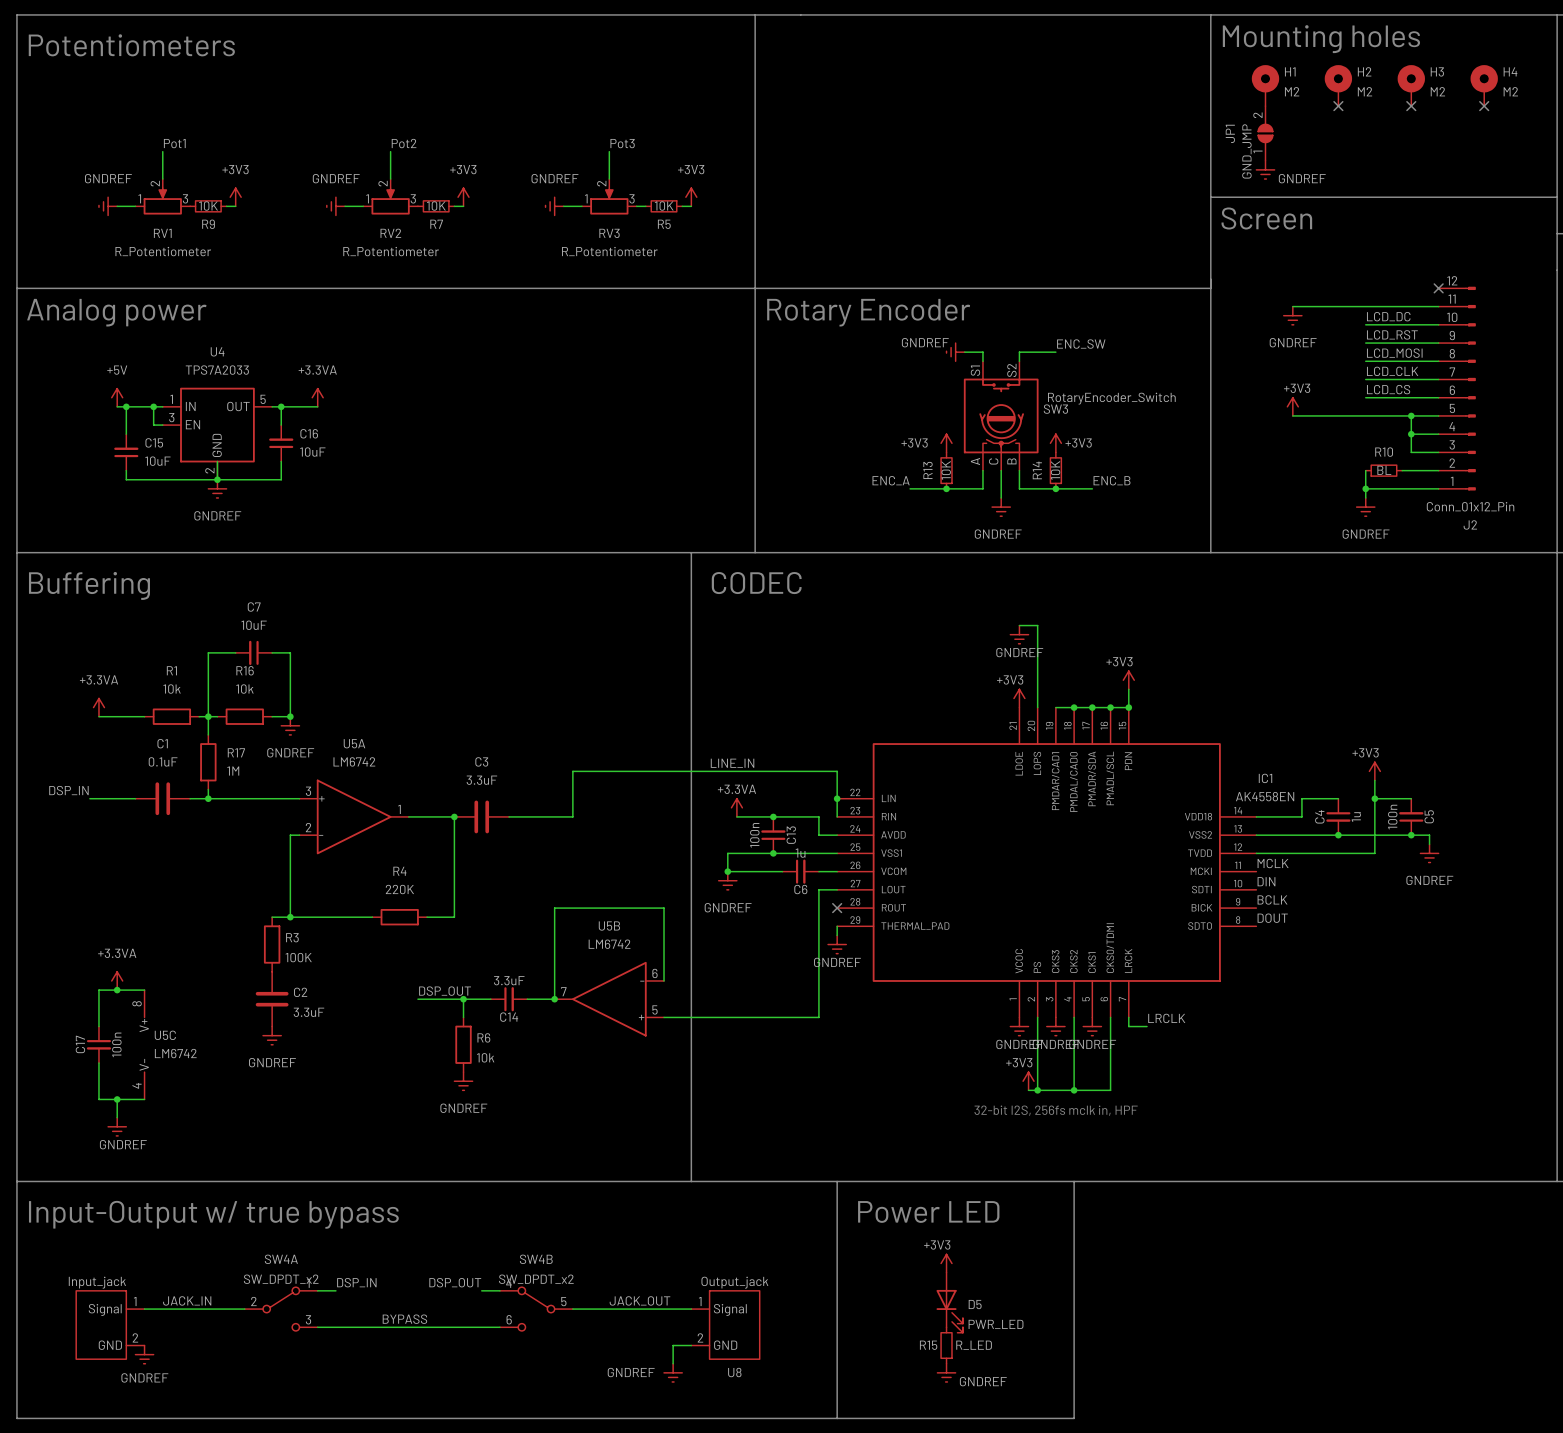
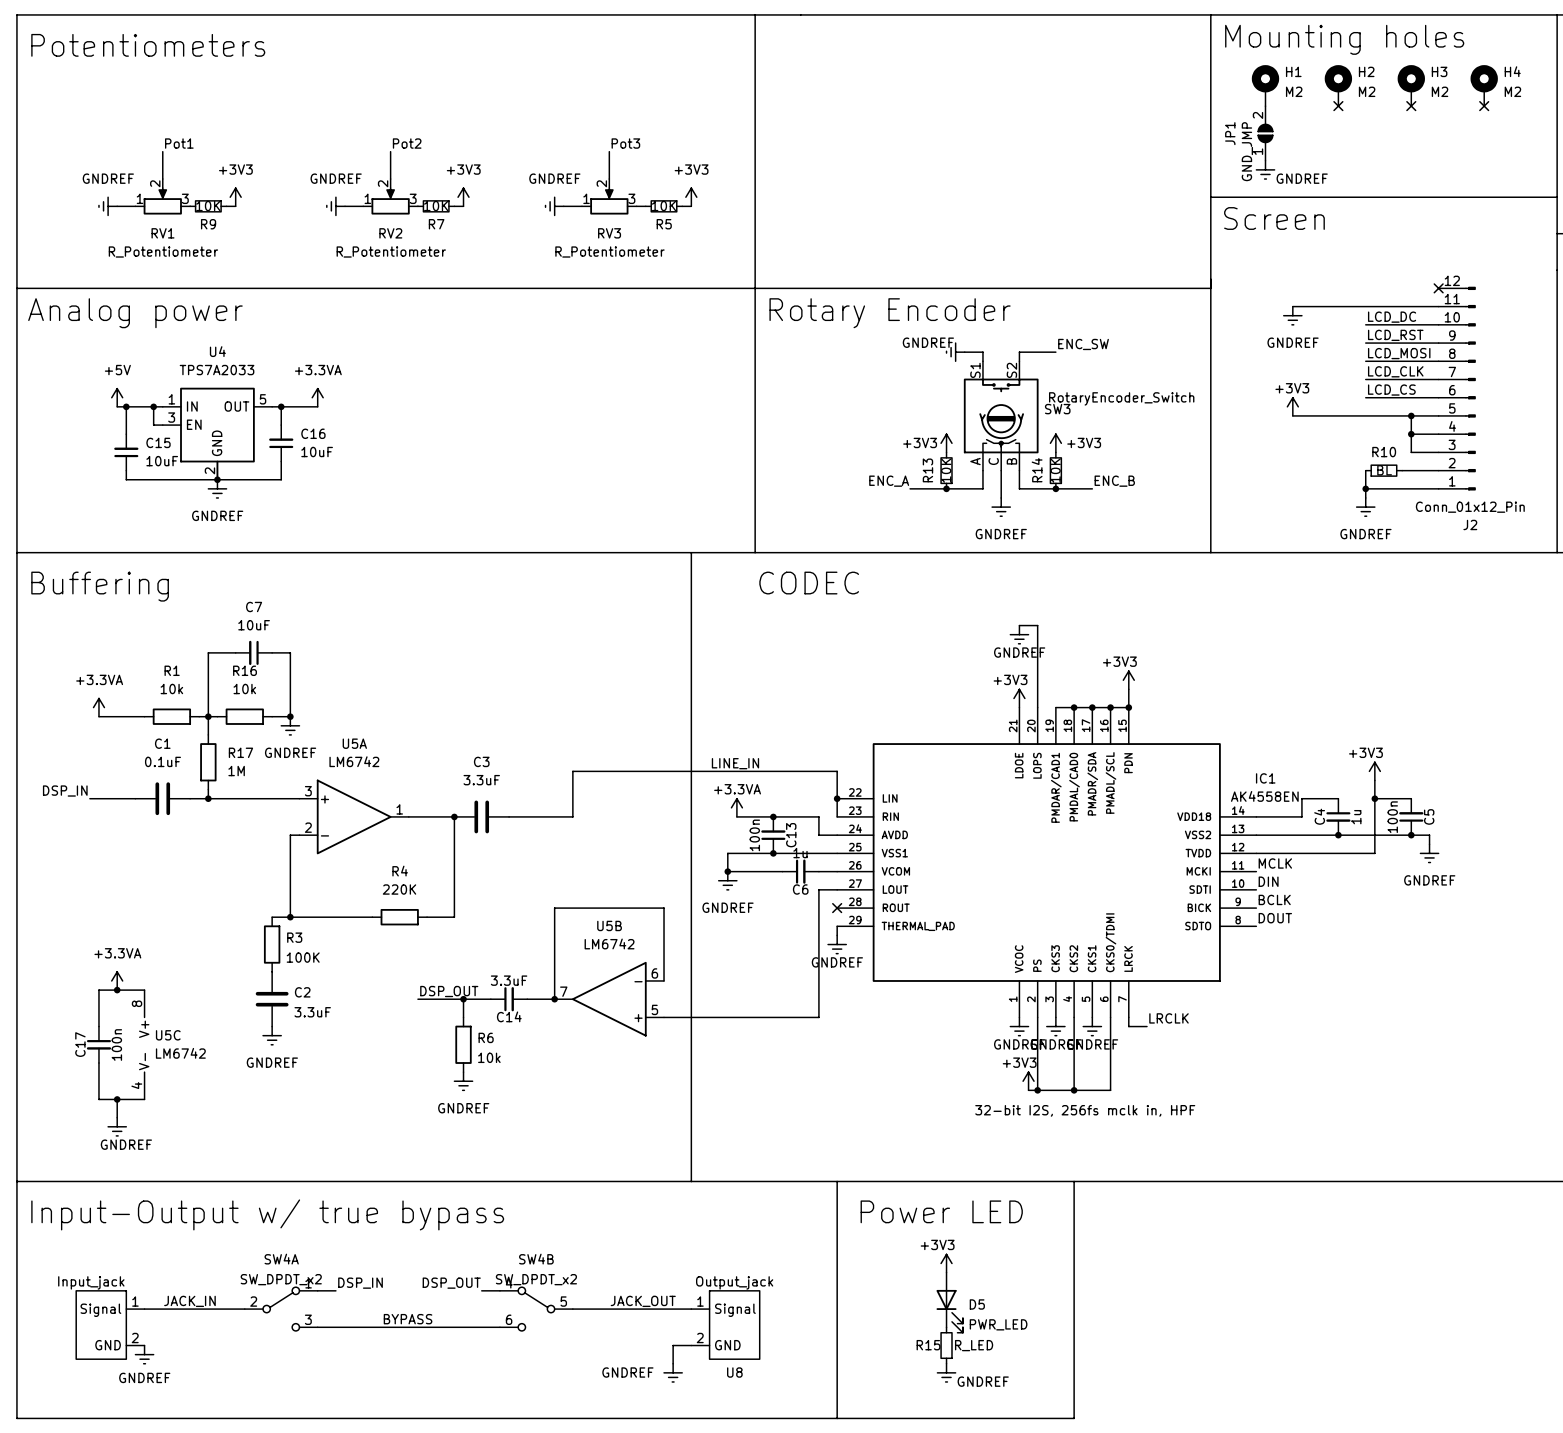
line: (1557, 552) (1557, 1181) -> none
text position: CODEC (756, 583) -> CODEC (809, 583)

